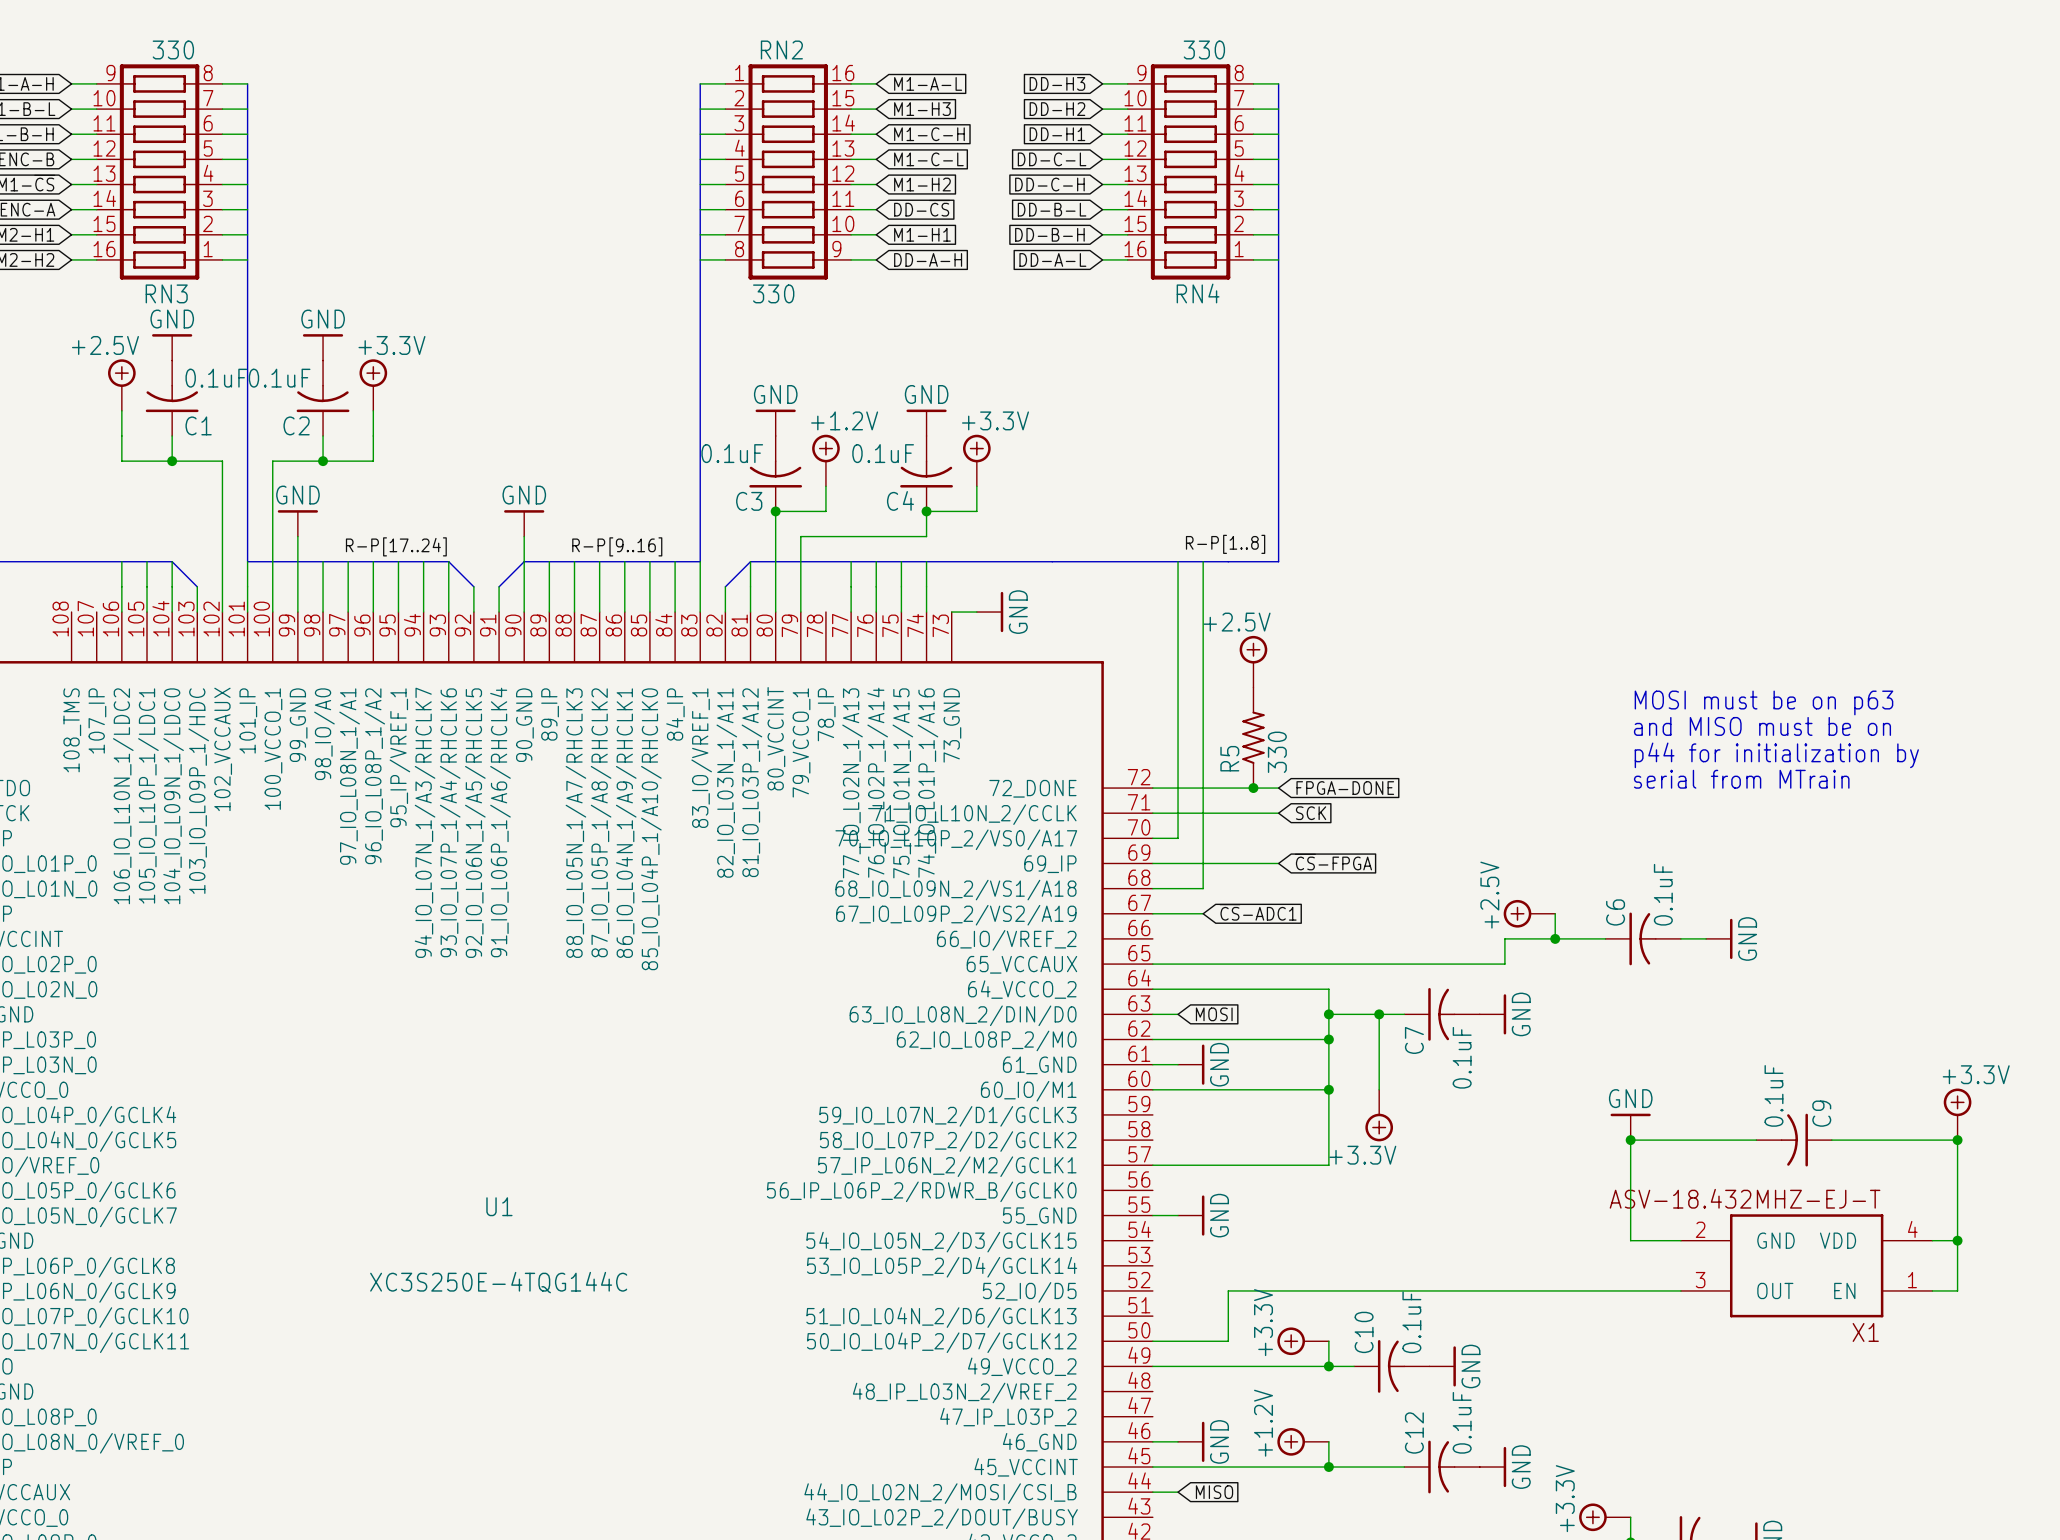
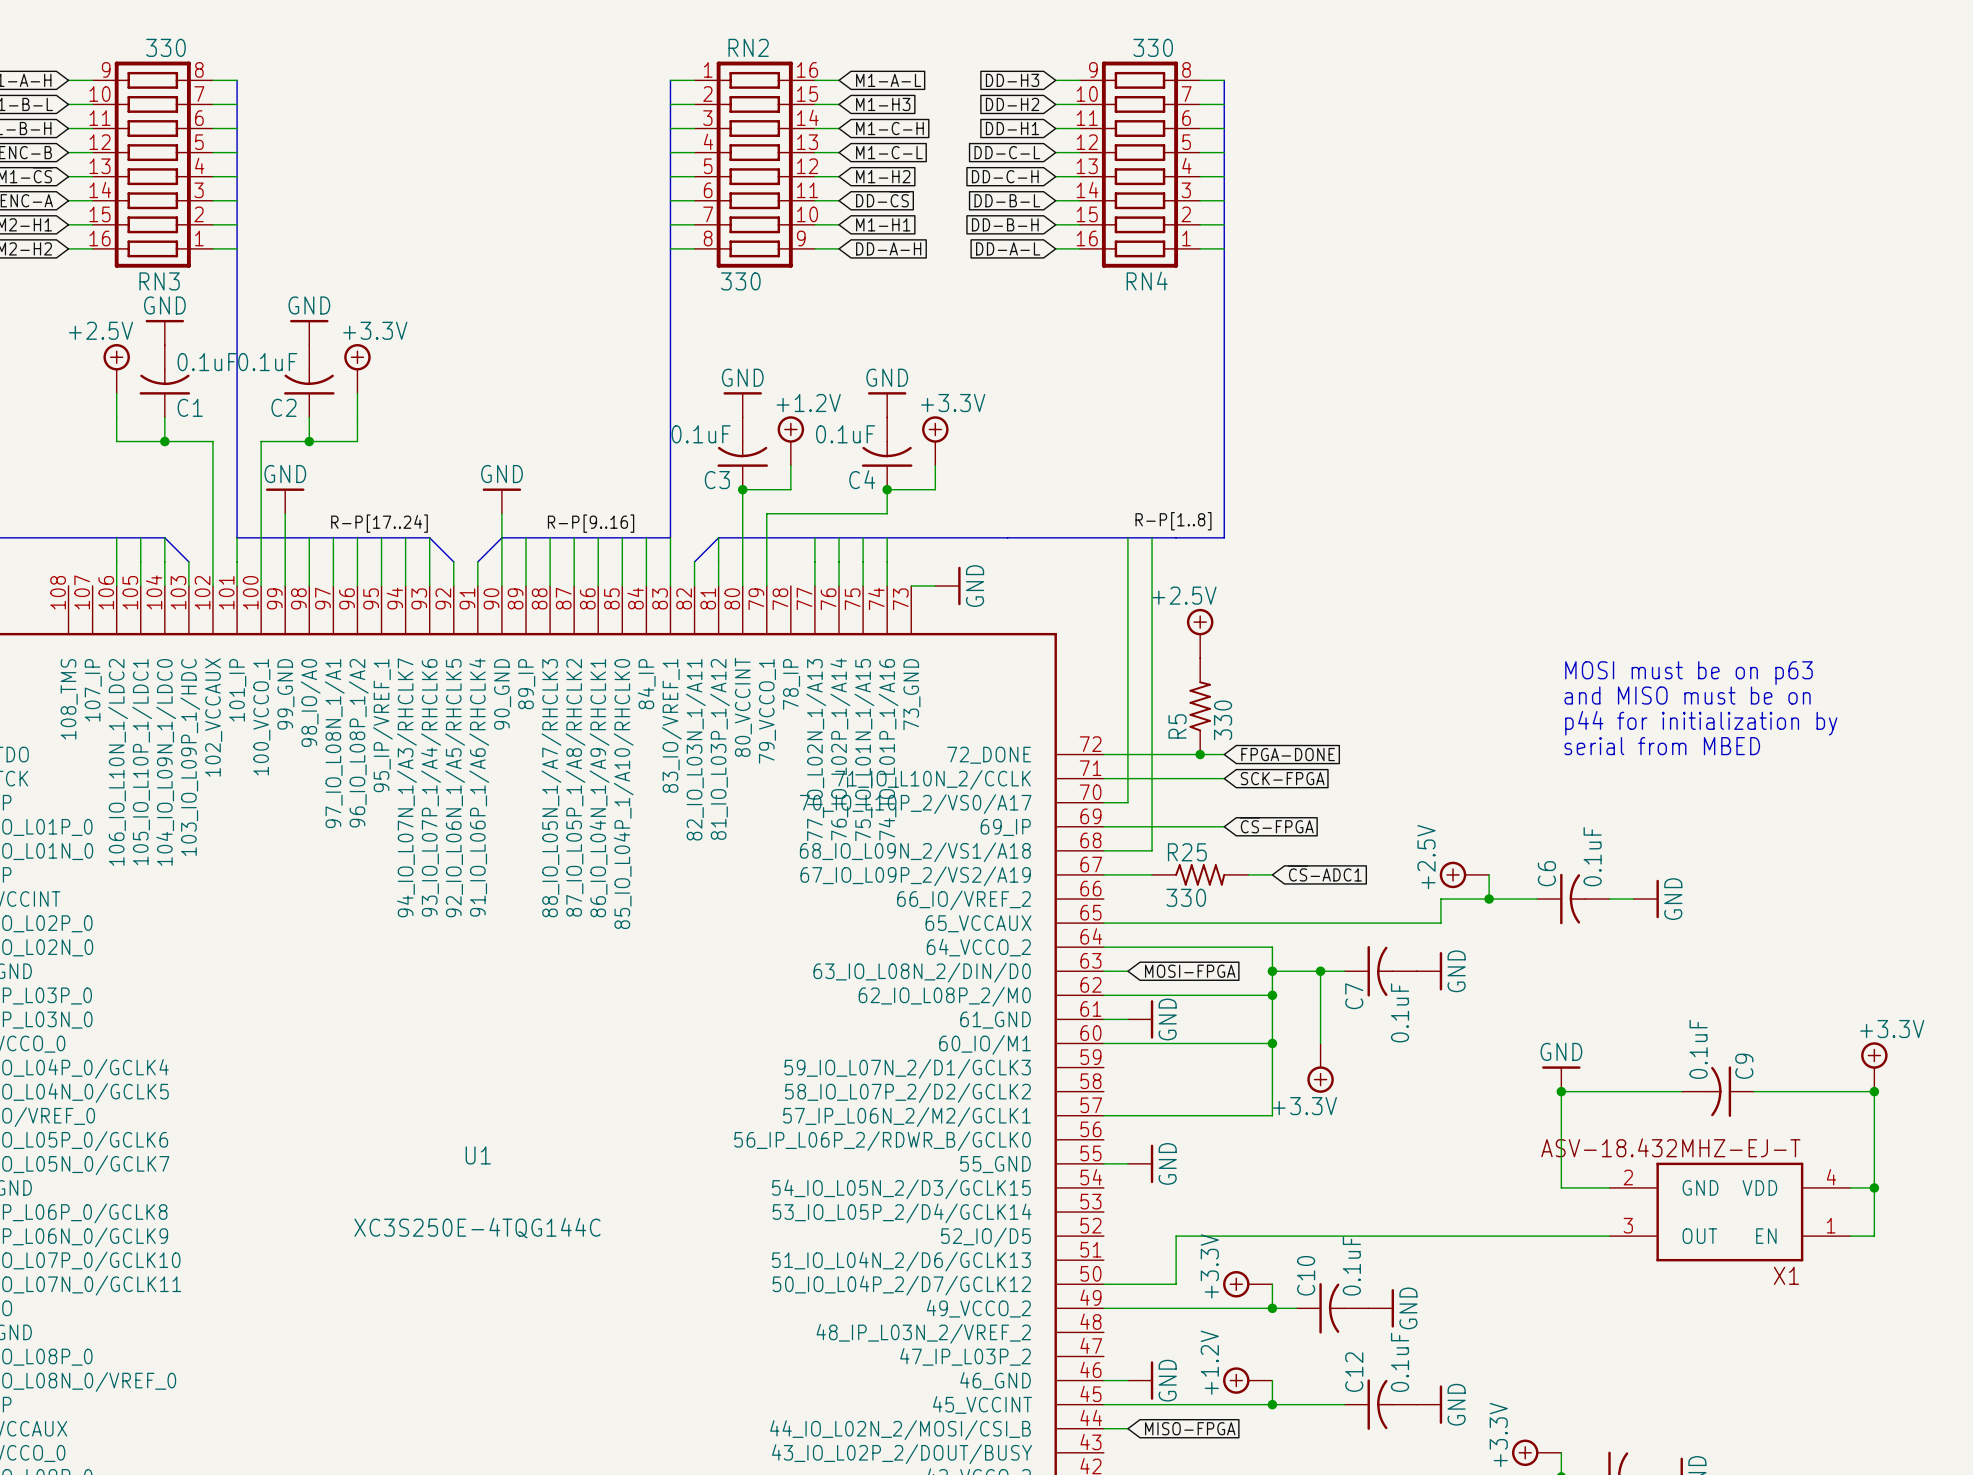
text: serial from MTrain (1741, 779) -> serial from MBED (1662, 746)
global label: SCK (1311, 813) -> SCK-FPGA (1282, 778)
global label position: ~{CS}-ADC1 (1258, 912) -> ~{CS}-ADC1 (1324, 873)
R25: none -> 330 (1200, 874)
wire: none -> (1248, 874) (1272, 874)
global label: MOSI (1214, 1014) -> MOSI-FPGA (1190, 971)
global label: MISO (1214, 1492) -> MISO-FPGA (1190, 1428)

